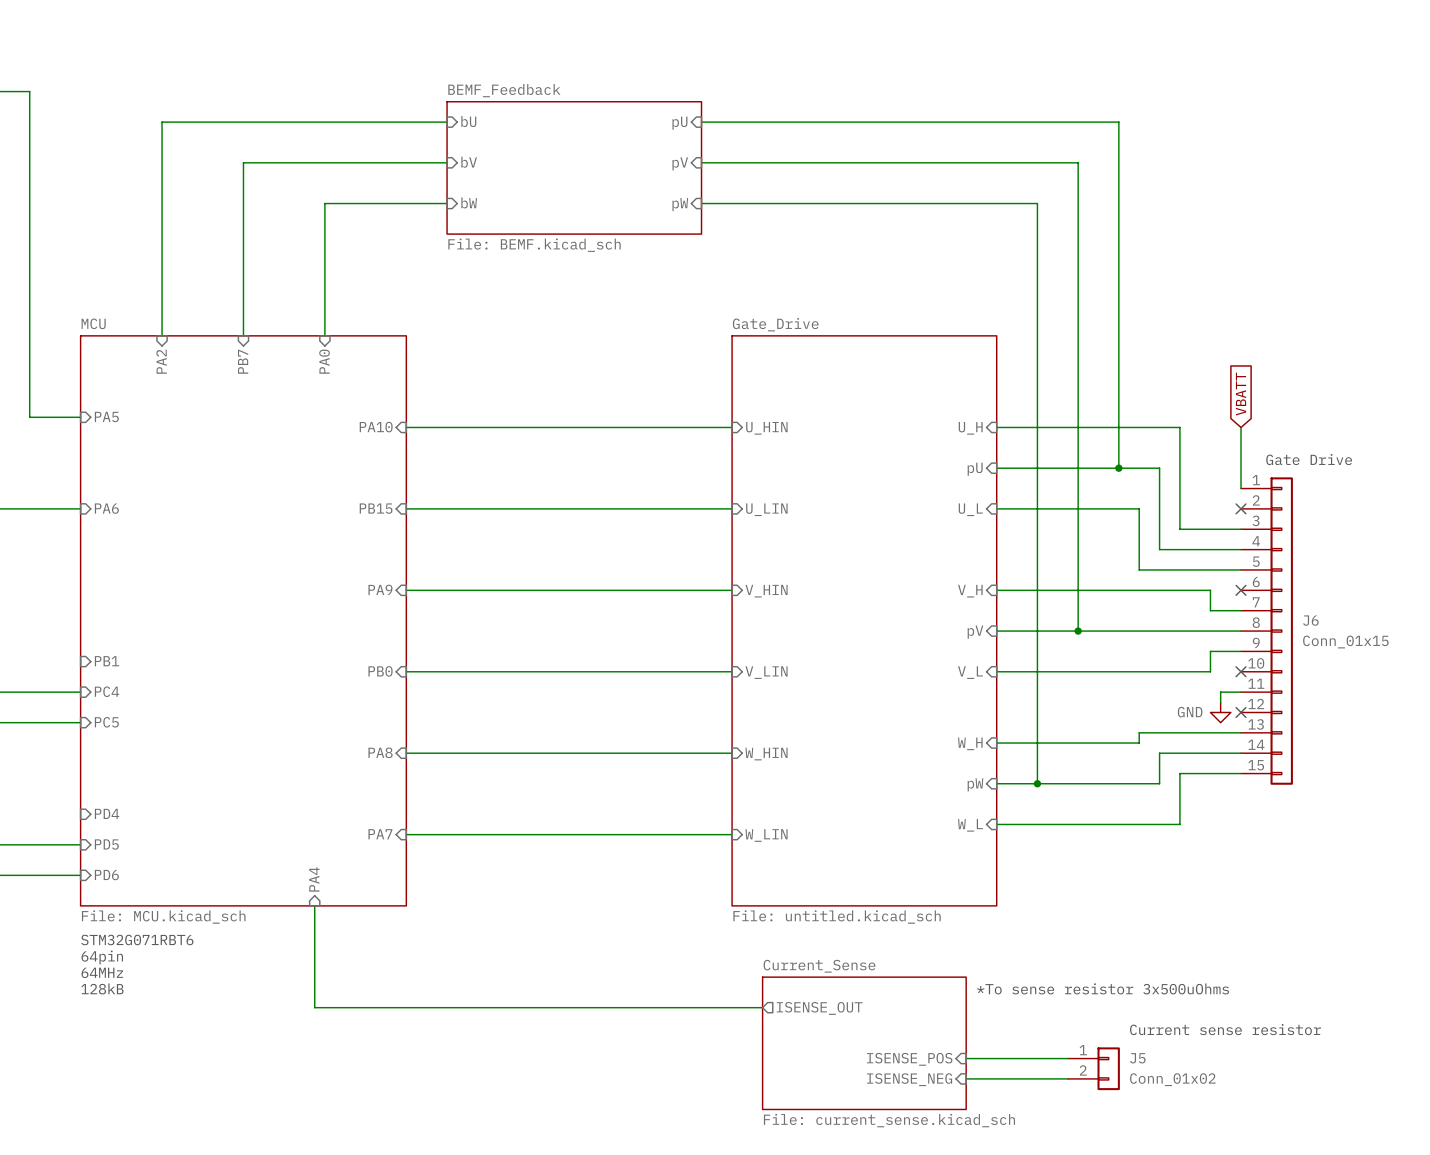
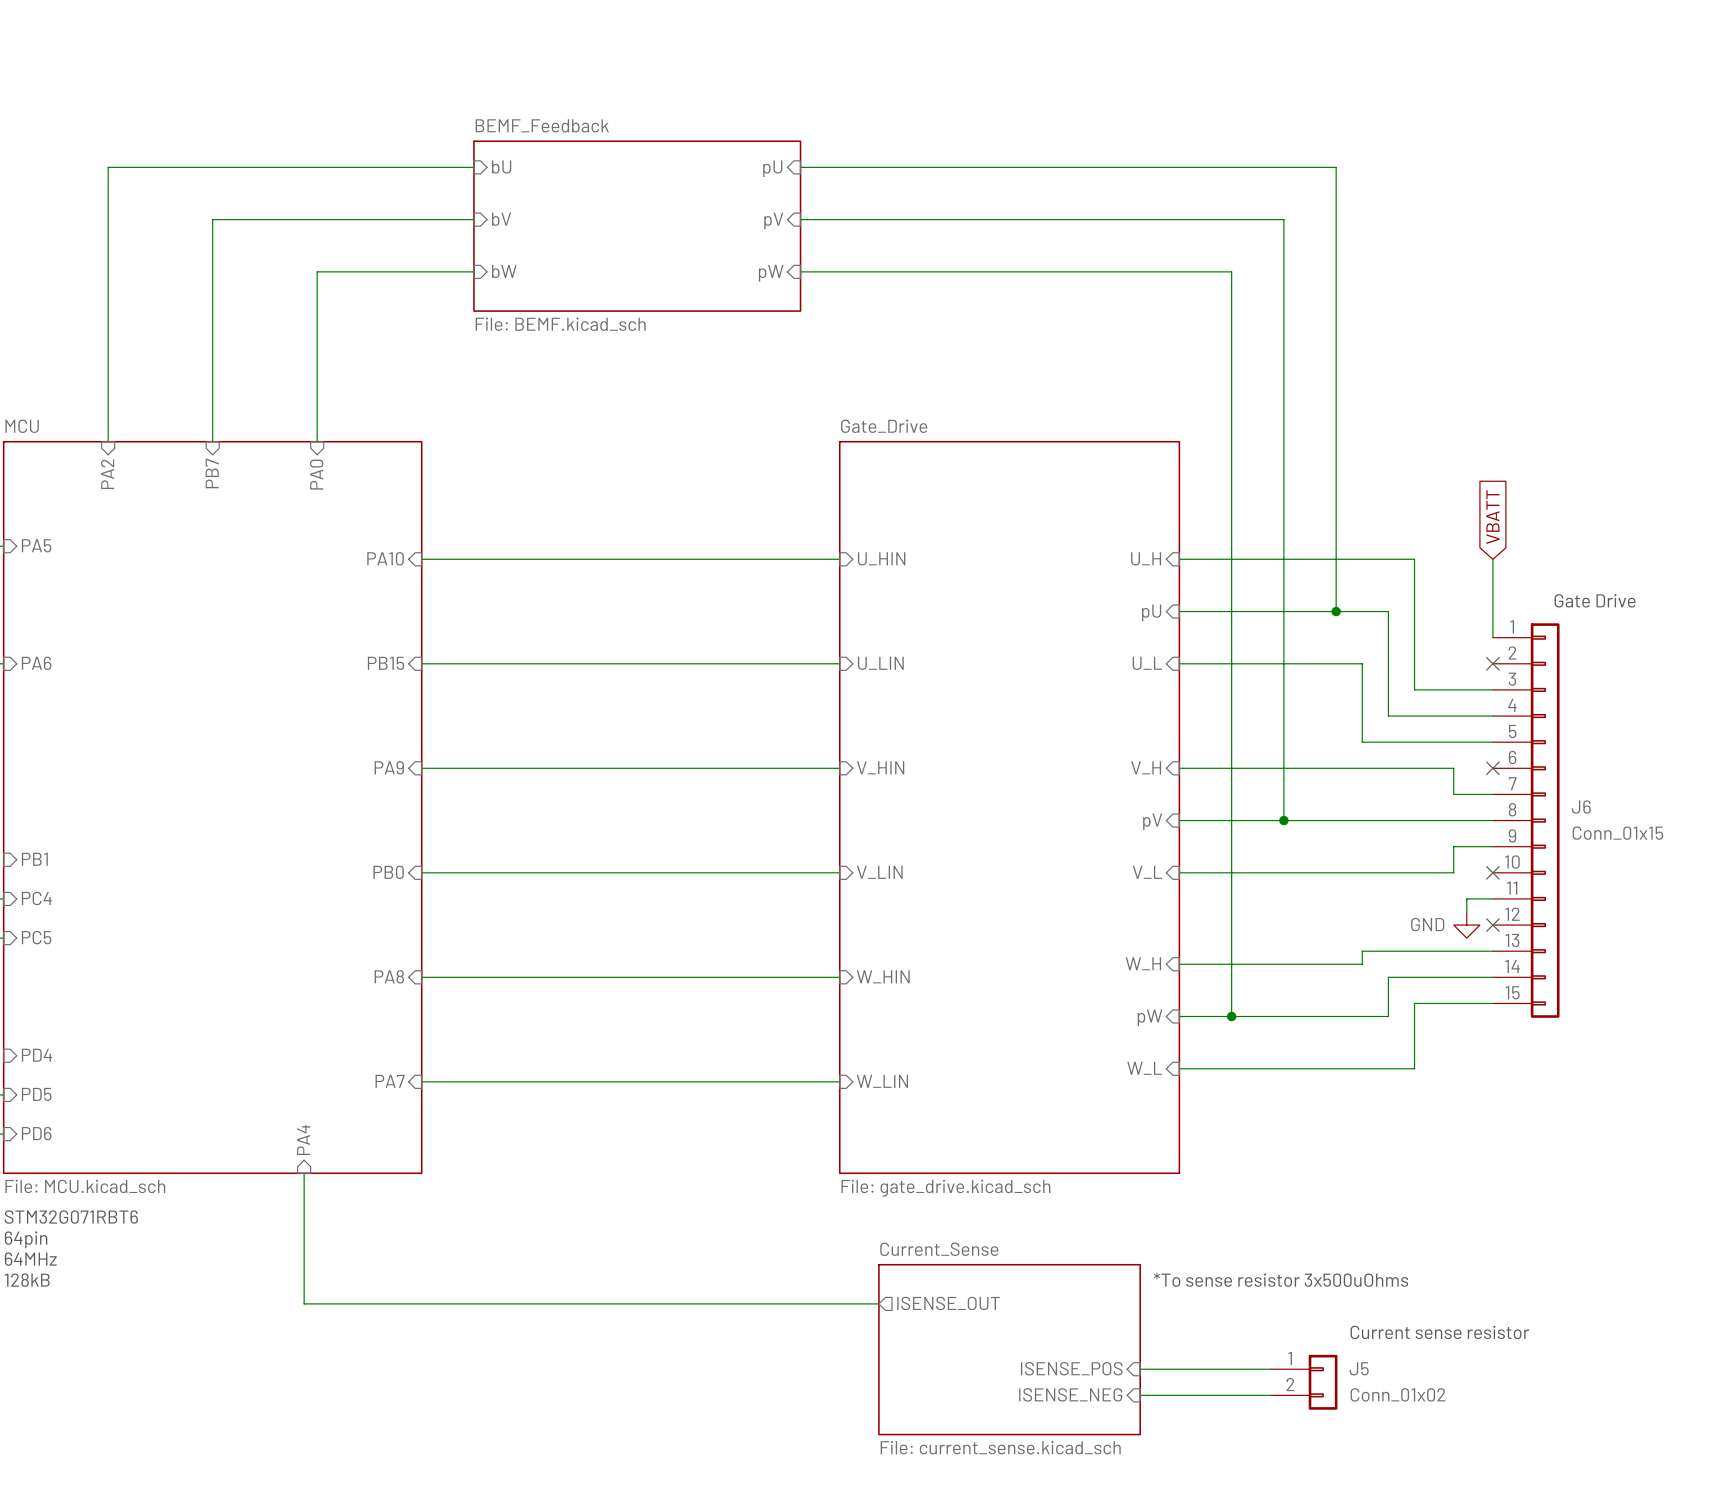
sheet Gate_Drive value: File: untitled.kicad_sch (837, 917) -> File: gate_drive.kicad_sch (945, 1188)

